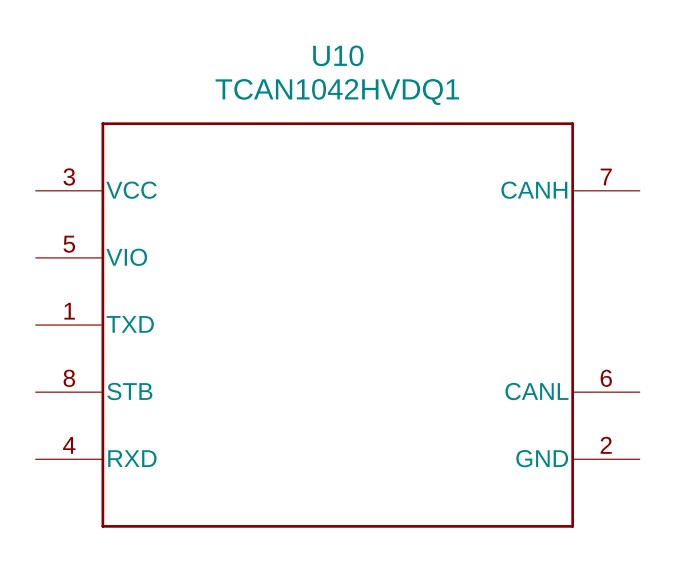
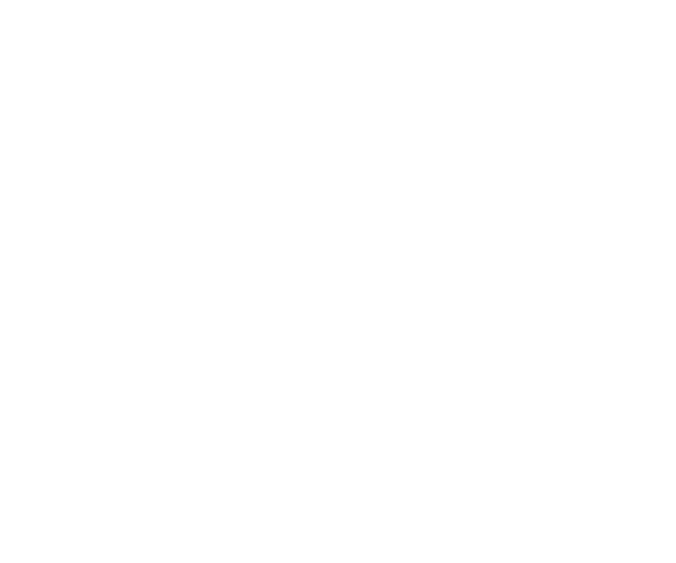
U10: TCAN1042HVDQ1 (337, 325) -> none

